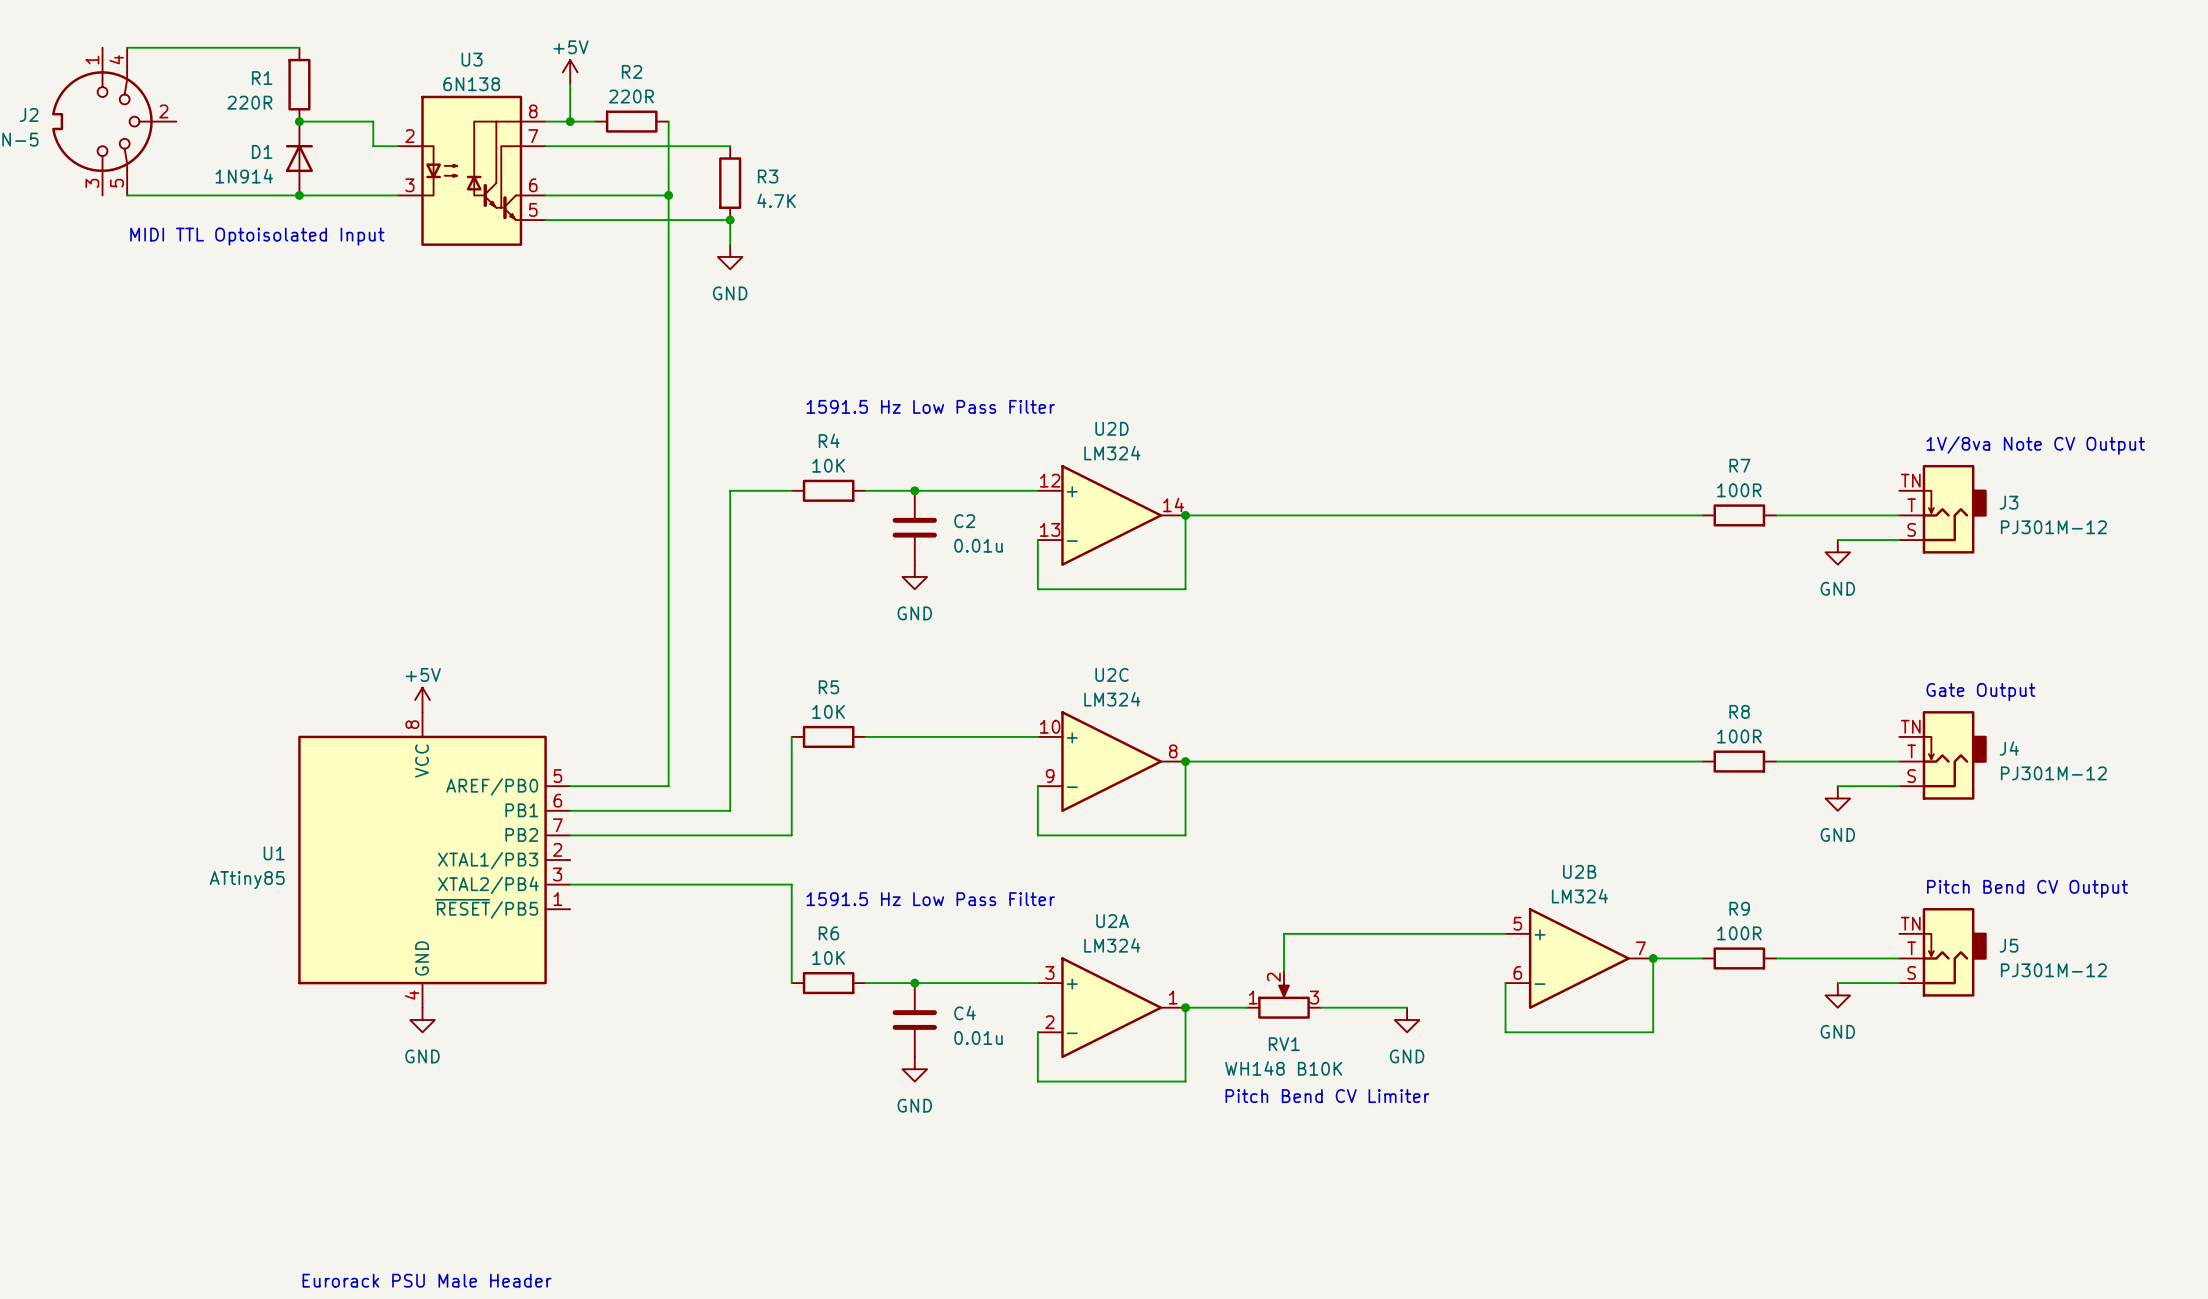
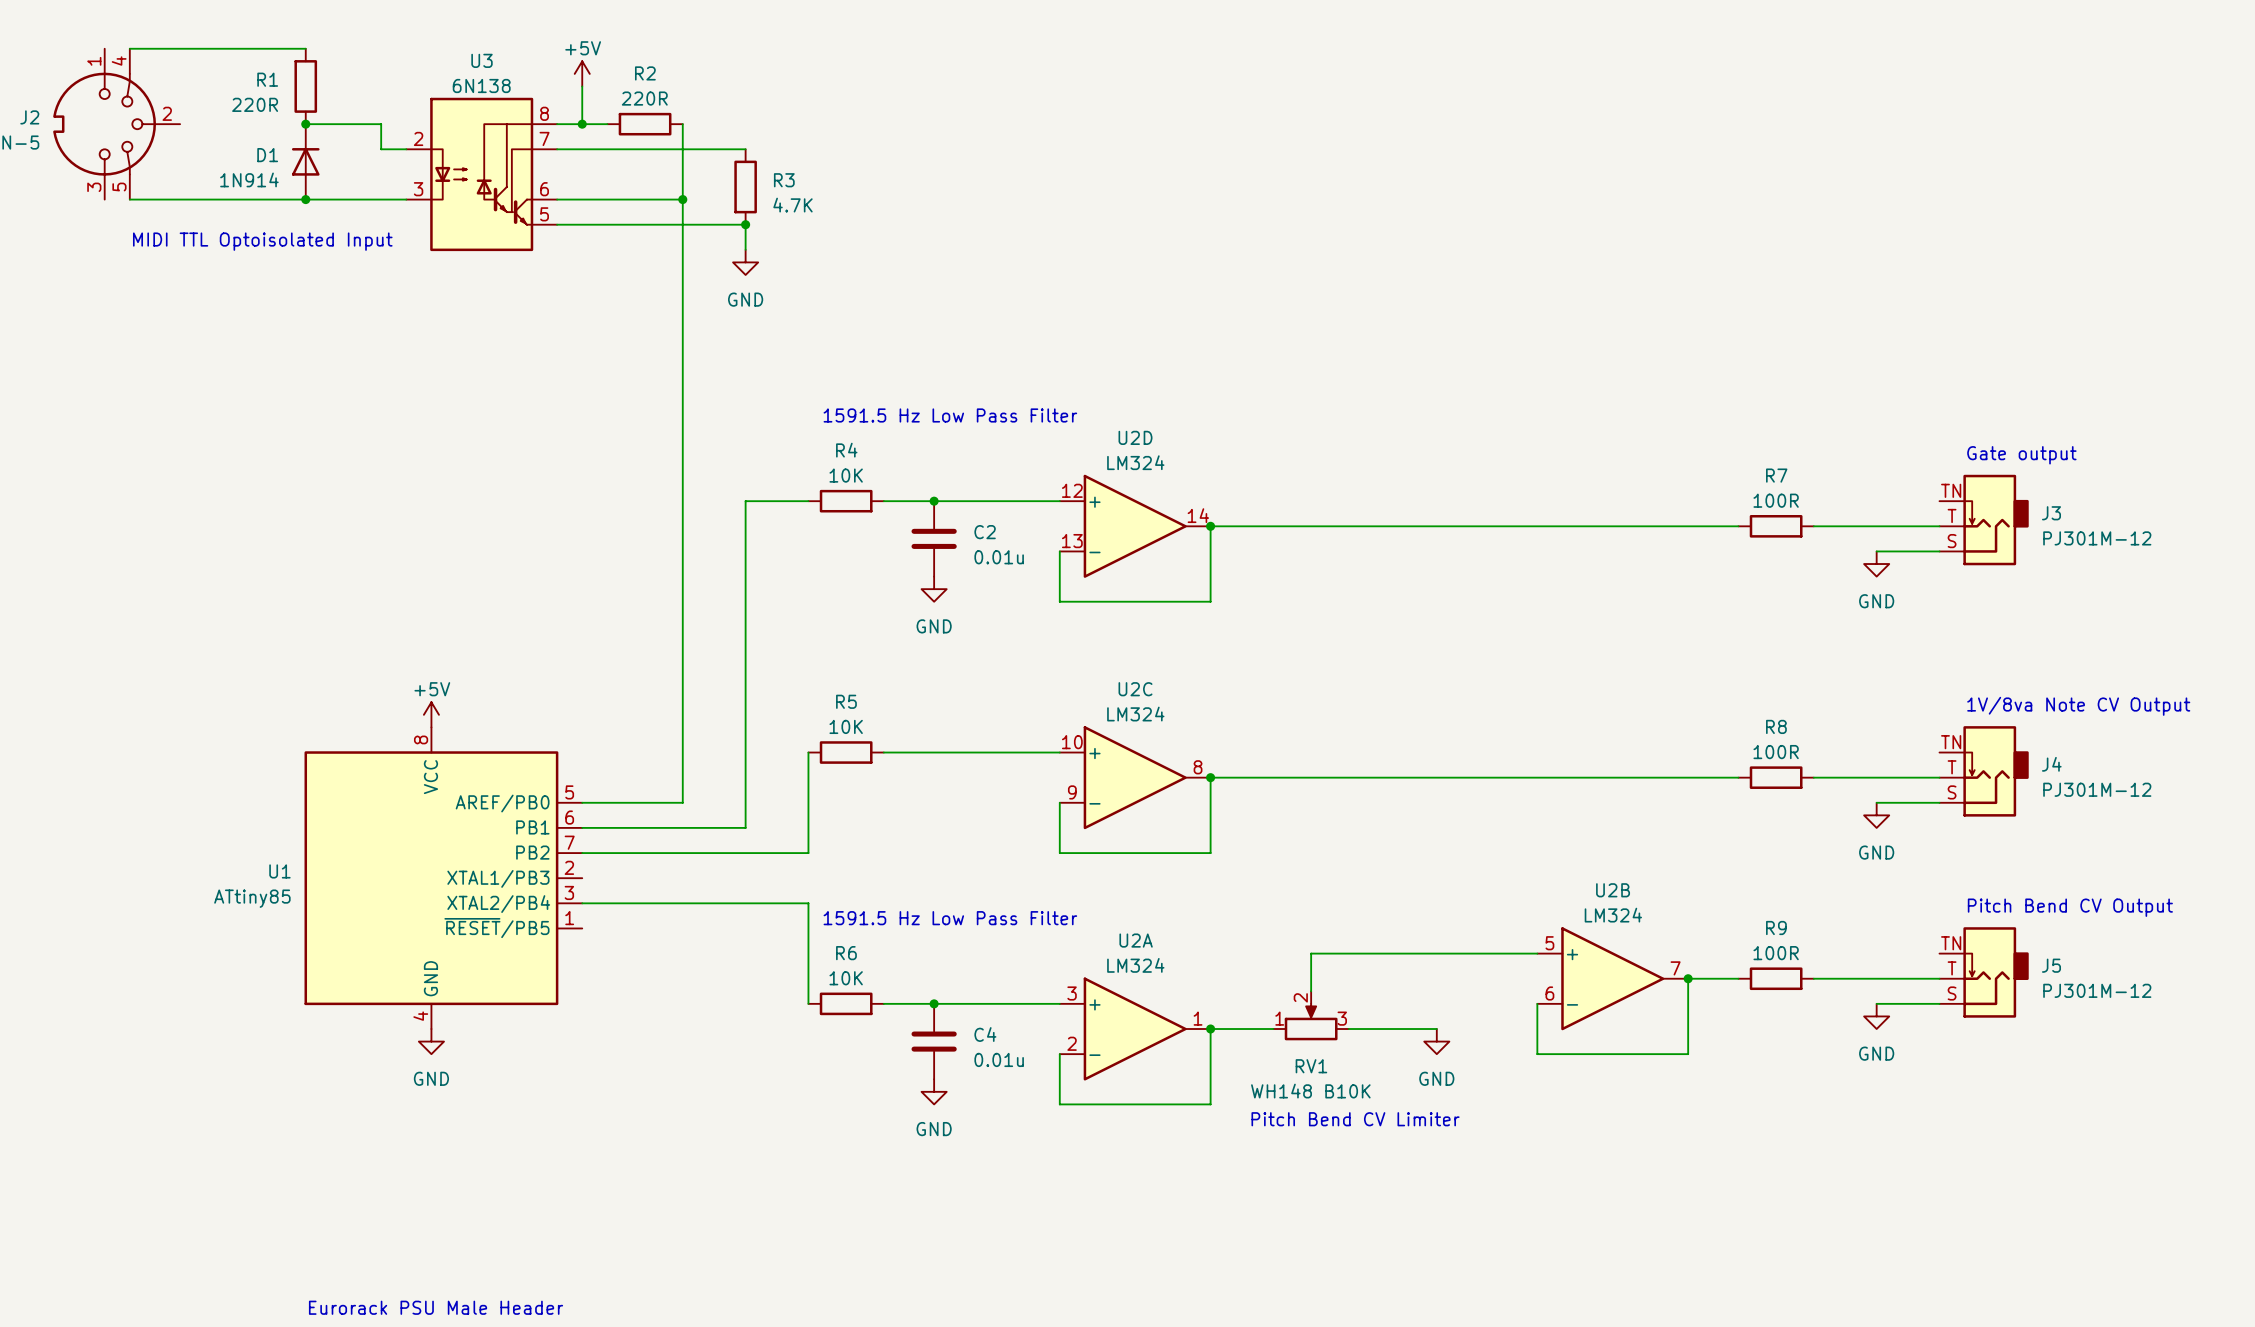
text: 1V/8va Note CV Output (2035, 445) -> Gate output (2021, 455)
text: Gate Output (1980, 691) -> 1V/8va Note CV Output (2078, 706)

